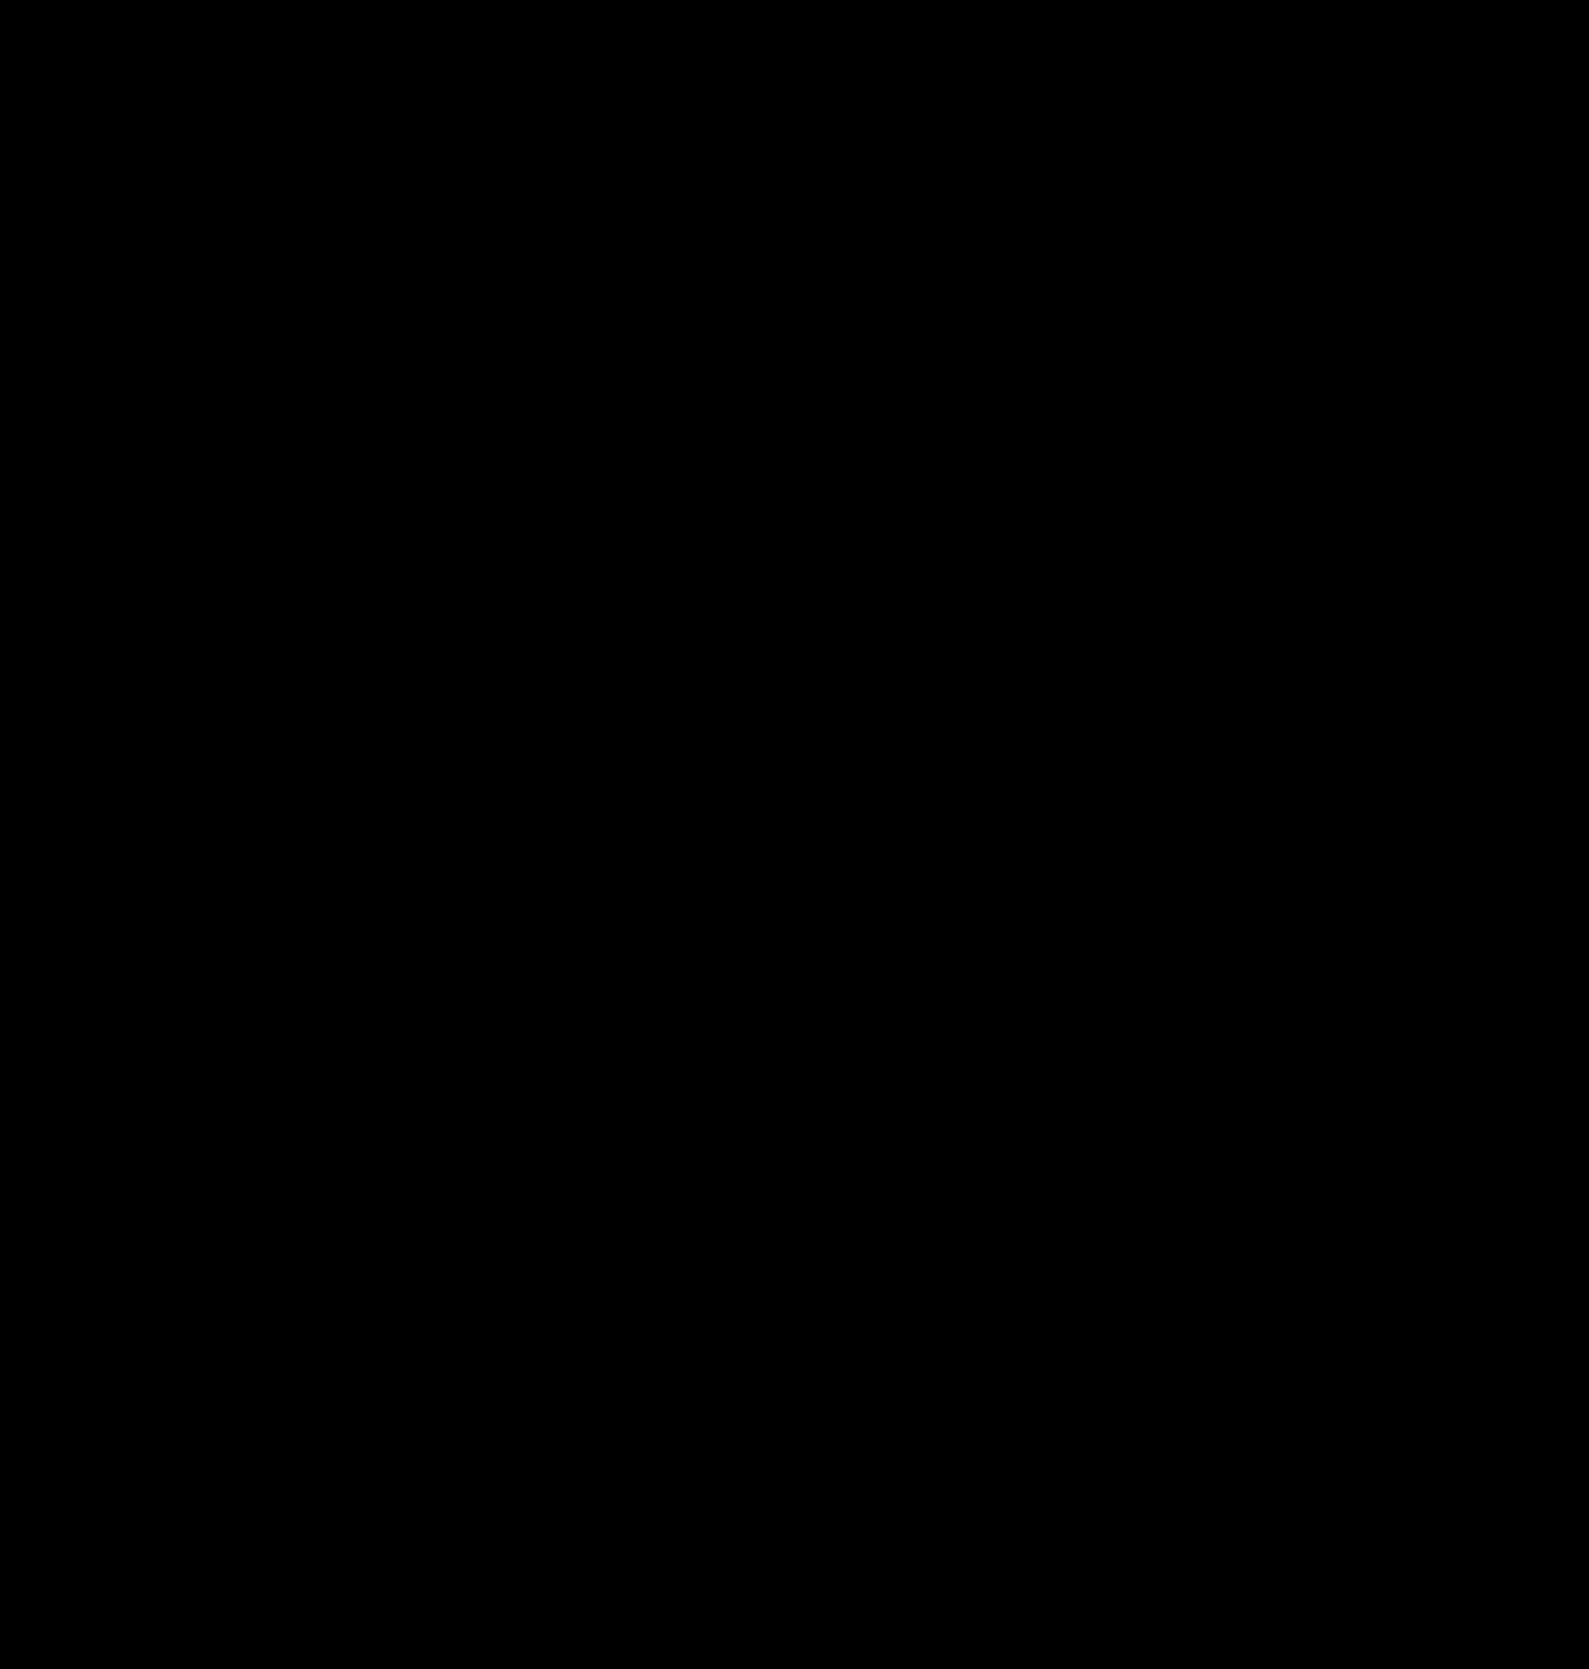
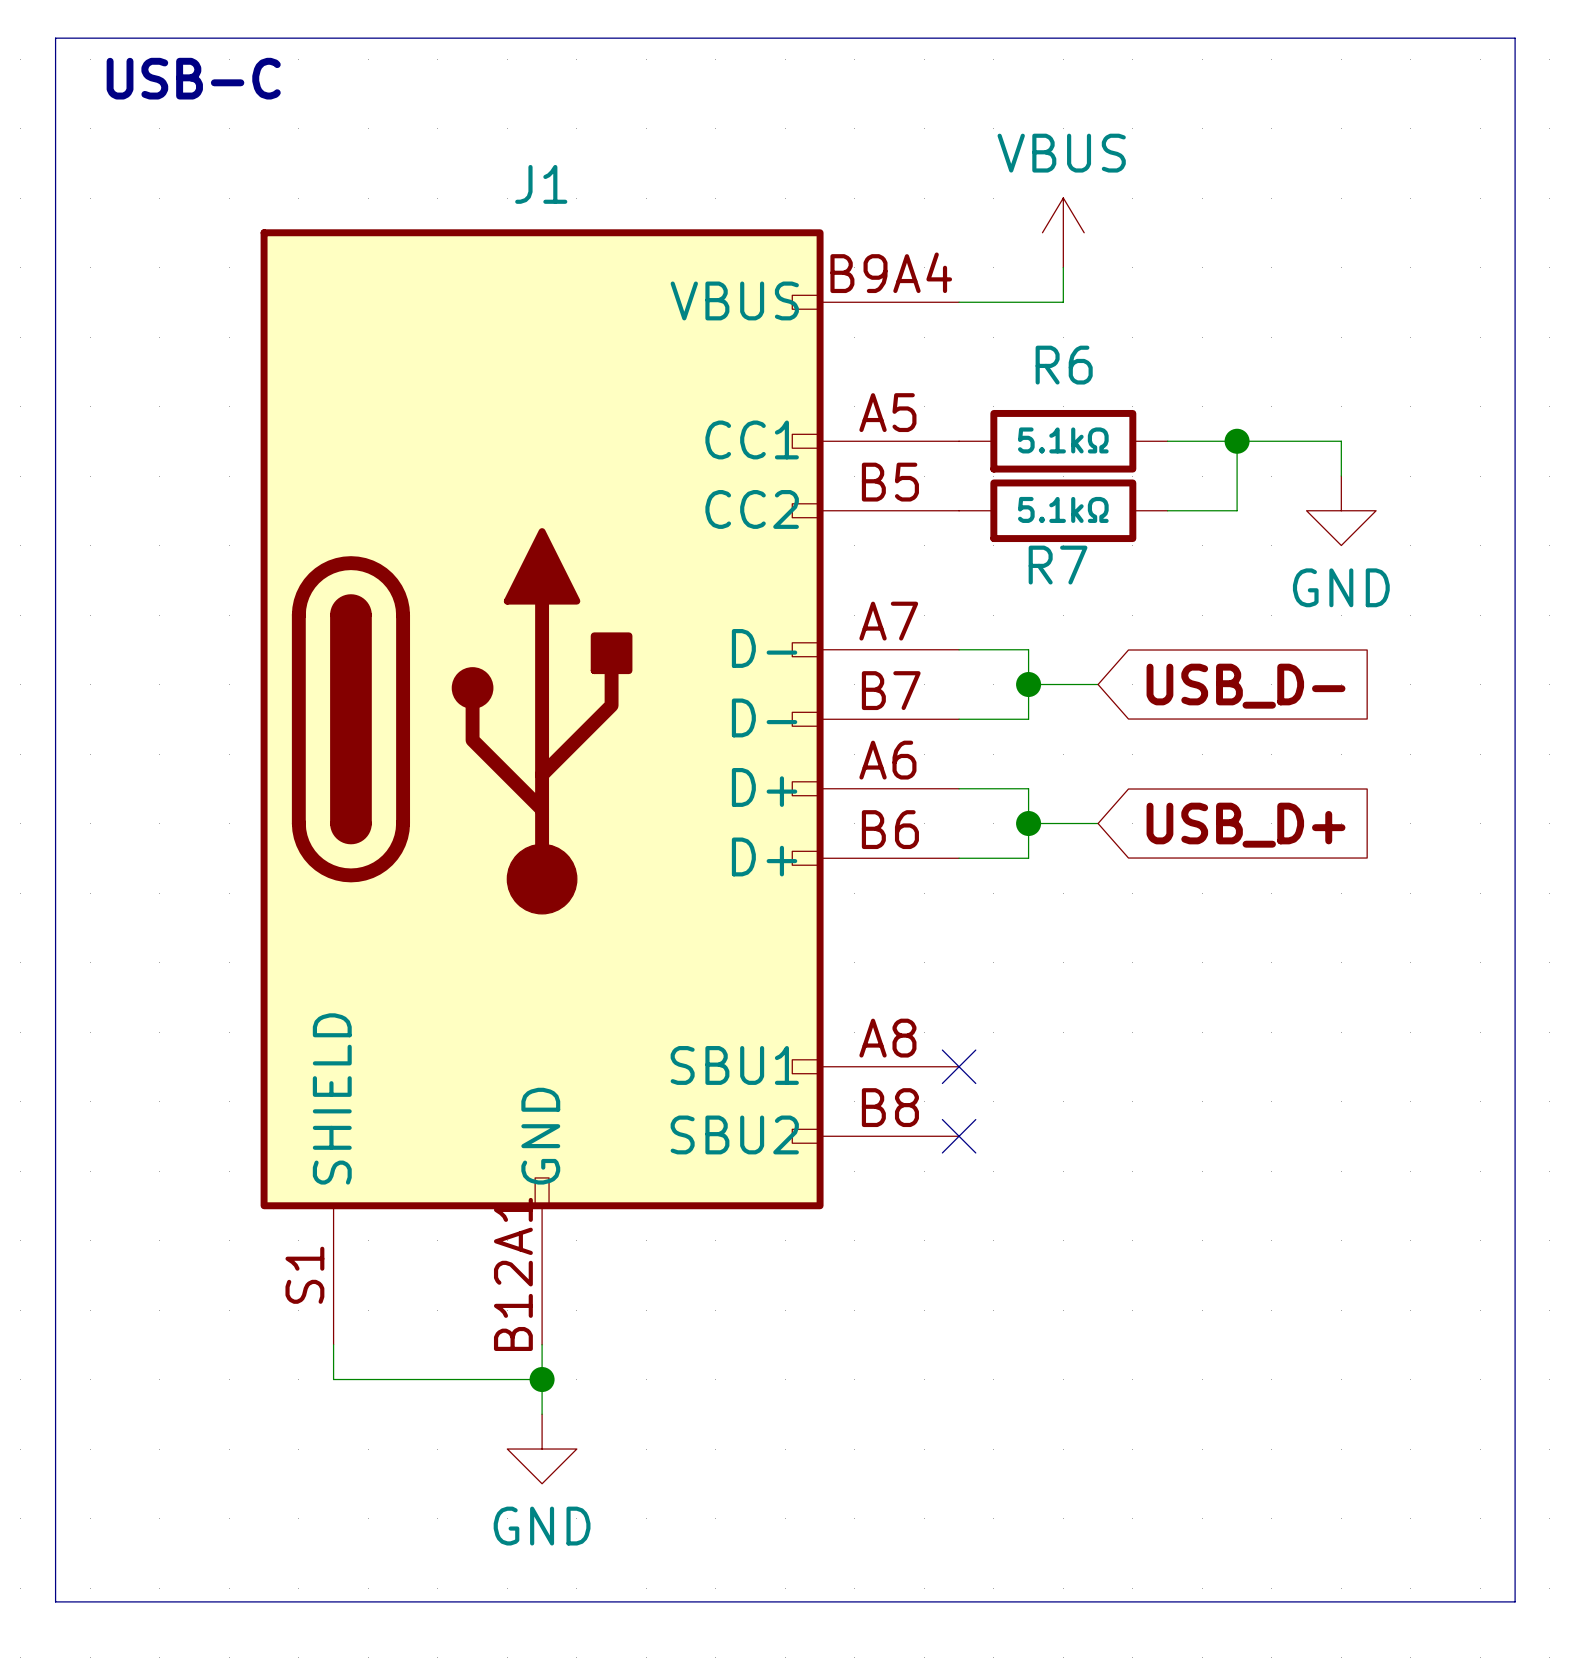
line: none -> (55, 38) (1515, 38) (1515, 1601) (55, 1601) (55, 38)
text: none -> USB-C (193, 78)
power symbol: none -> VBUS (1063, 232)
wire: none -> (1063, 267) (1063, 302) (959, 302)
R6: none -> 5.1kΩ (1063, 441)
wire: none -> (1167, 441) (1341, 441) (1341, 476)
wire: none -> (1237, 441) (1237, 510) (1167, 510)
junction: none -> (1237, 441)
R7: none -> 5.1kΩ (1063, 510)
power symbol: none -> GND (1341, 510)
wire: none -> (959, 649) (1028, 649) (1028, 719) (959, 719)
wire: none -> (1028, 684) (1098, 684)
junction: none -> (1028, 684)
global label: none -> USB_D- (1246, 686)
J1: none -> (609, 787)
wire: none -> (959, 788) (1028, 788) (1028, 858) (959, 858)
wire: none -> (1028, 823) (1098, 823)
junction: none -> (1028, 823)
global label: none -> USB_D+ (1246, 825)
no-connect mark: none -> (959, 1066)
no-connect mark: none -> (959, 1136)
wire: none -> (333, 1344) (333, 1379) (542, 1379)
wire: none -> (542, 1344) (542, 1414)
junction: none -> (542, 1379)
power symbol: none -> GND (542, 1449)

